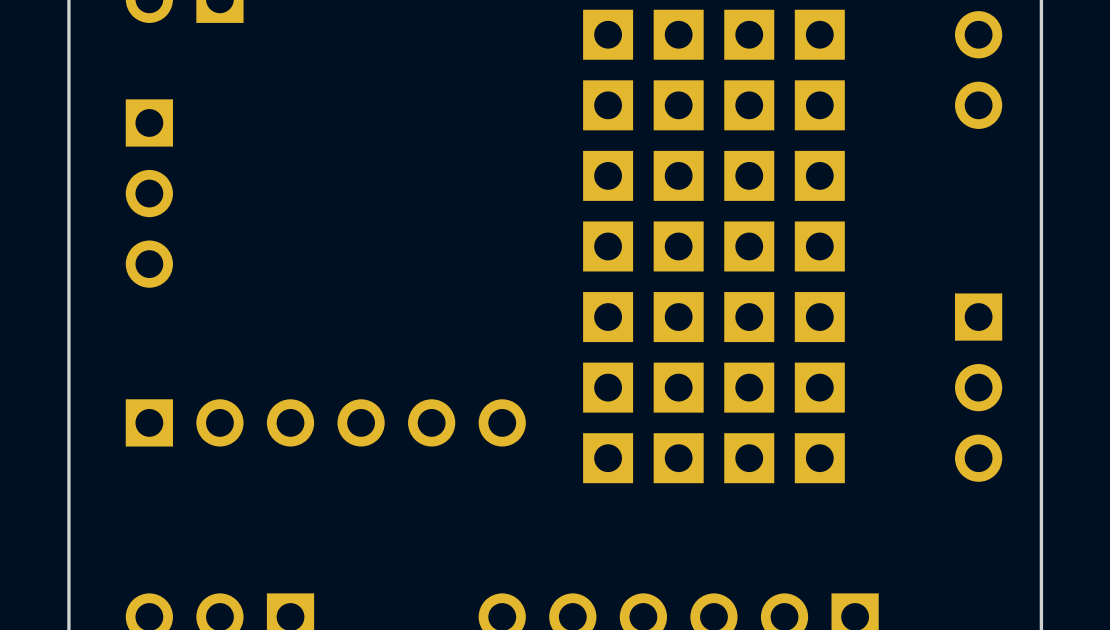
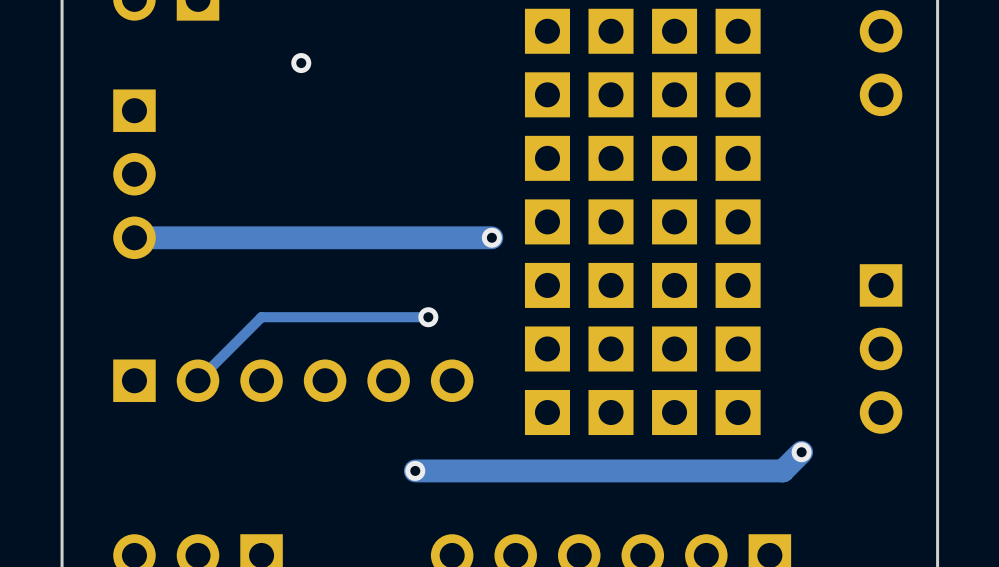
via: none -> (301, 63)
track: none -> (491, 237) (134, 237)
via: none -> (491, 237)
track: none -> (428, 317) (261, 317) (198, 380)
via: none -> (428, 317)
track: none -> (801, 452) (782, 470) (415, 470)
via: none -> (801, 452)
via: none -> (415, 470)

